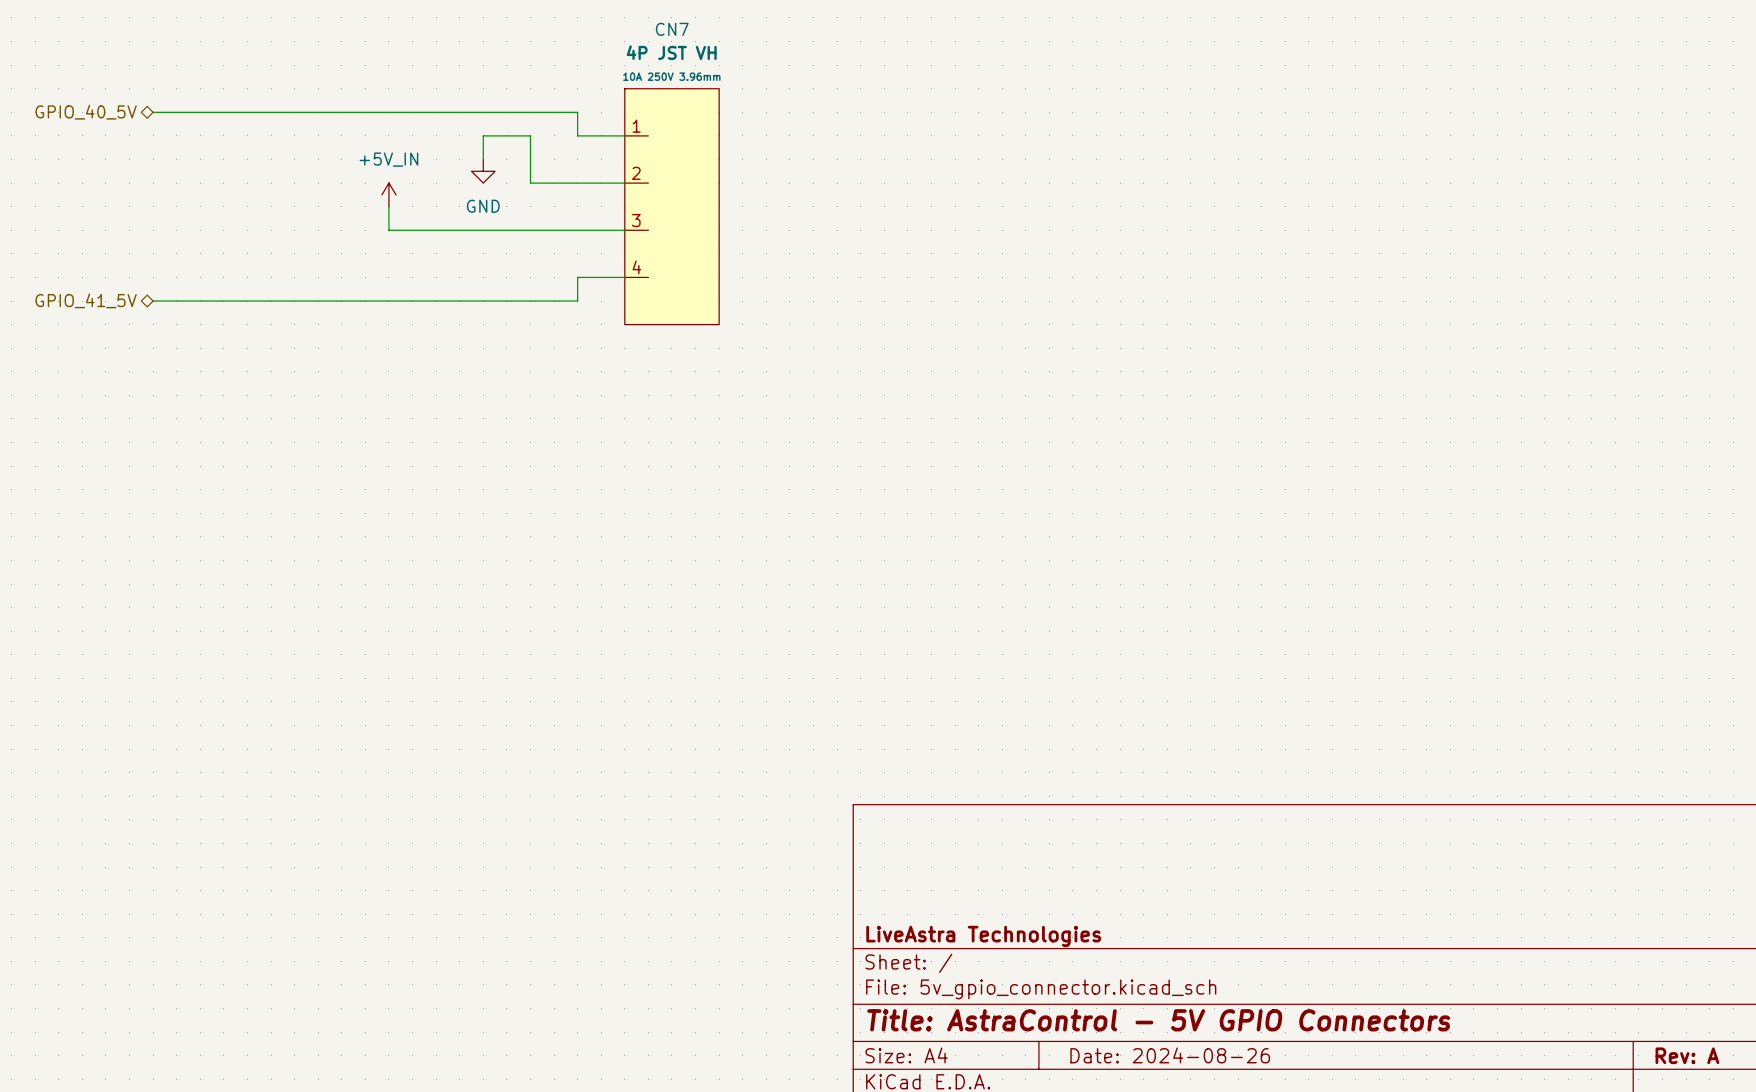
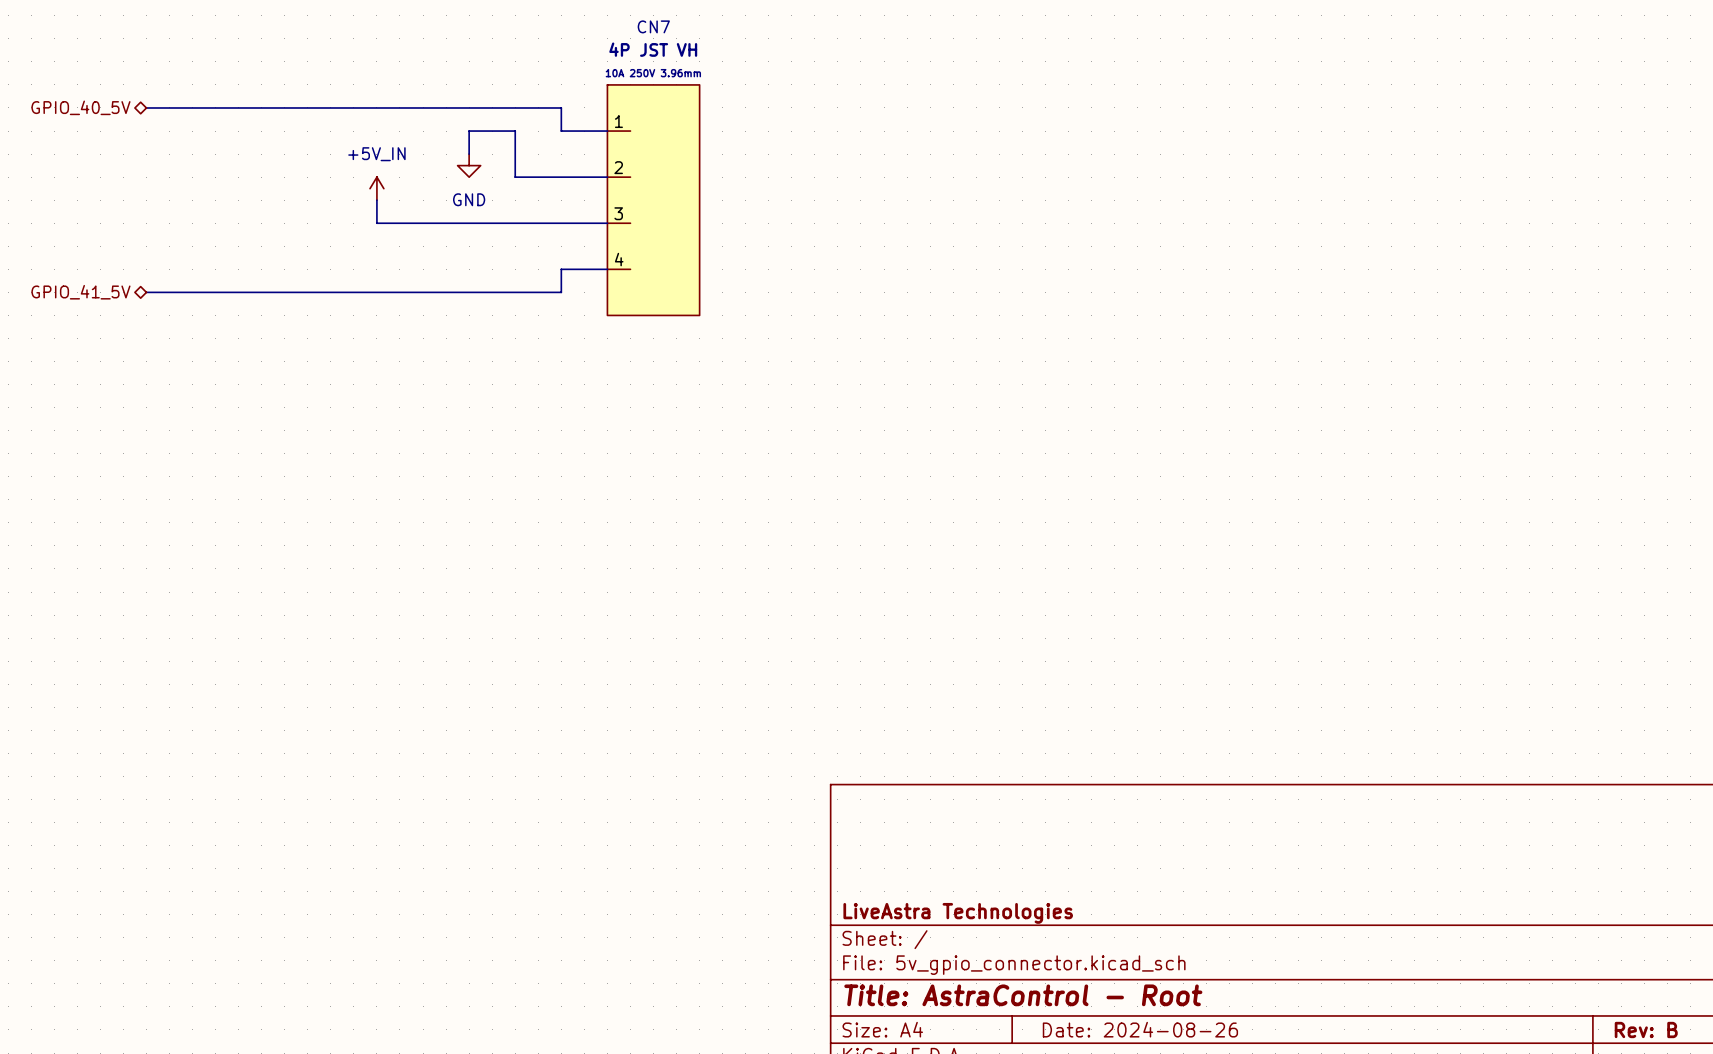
title block: Title: AstraControl - 5V GPIO Connectors (1158, 1020) -> Title: AstraControl - Root (1023, 995)
title block: Rev: A (1687, 1055) -> Rev: B (1646, 1029)

